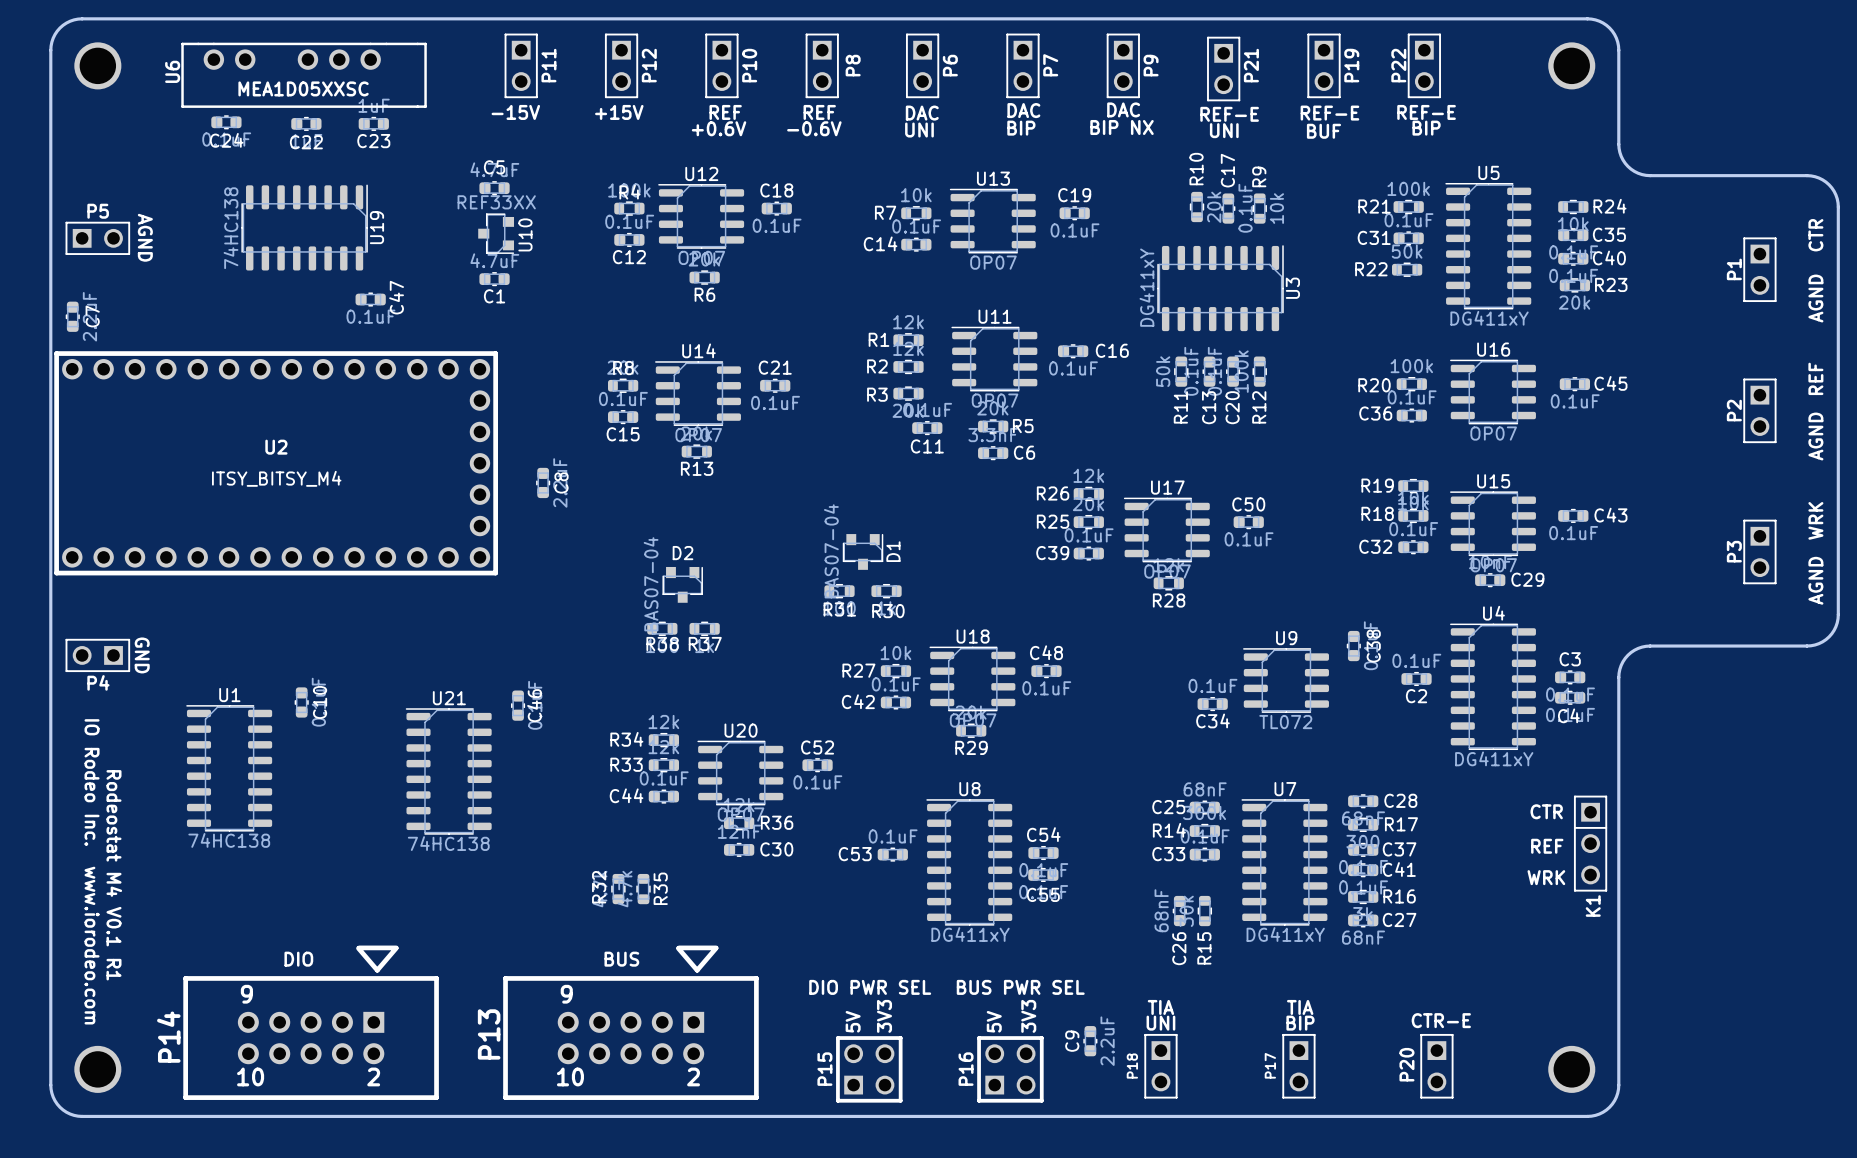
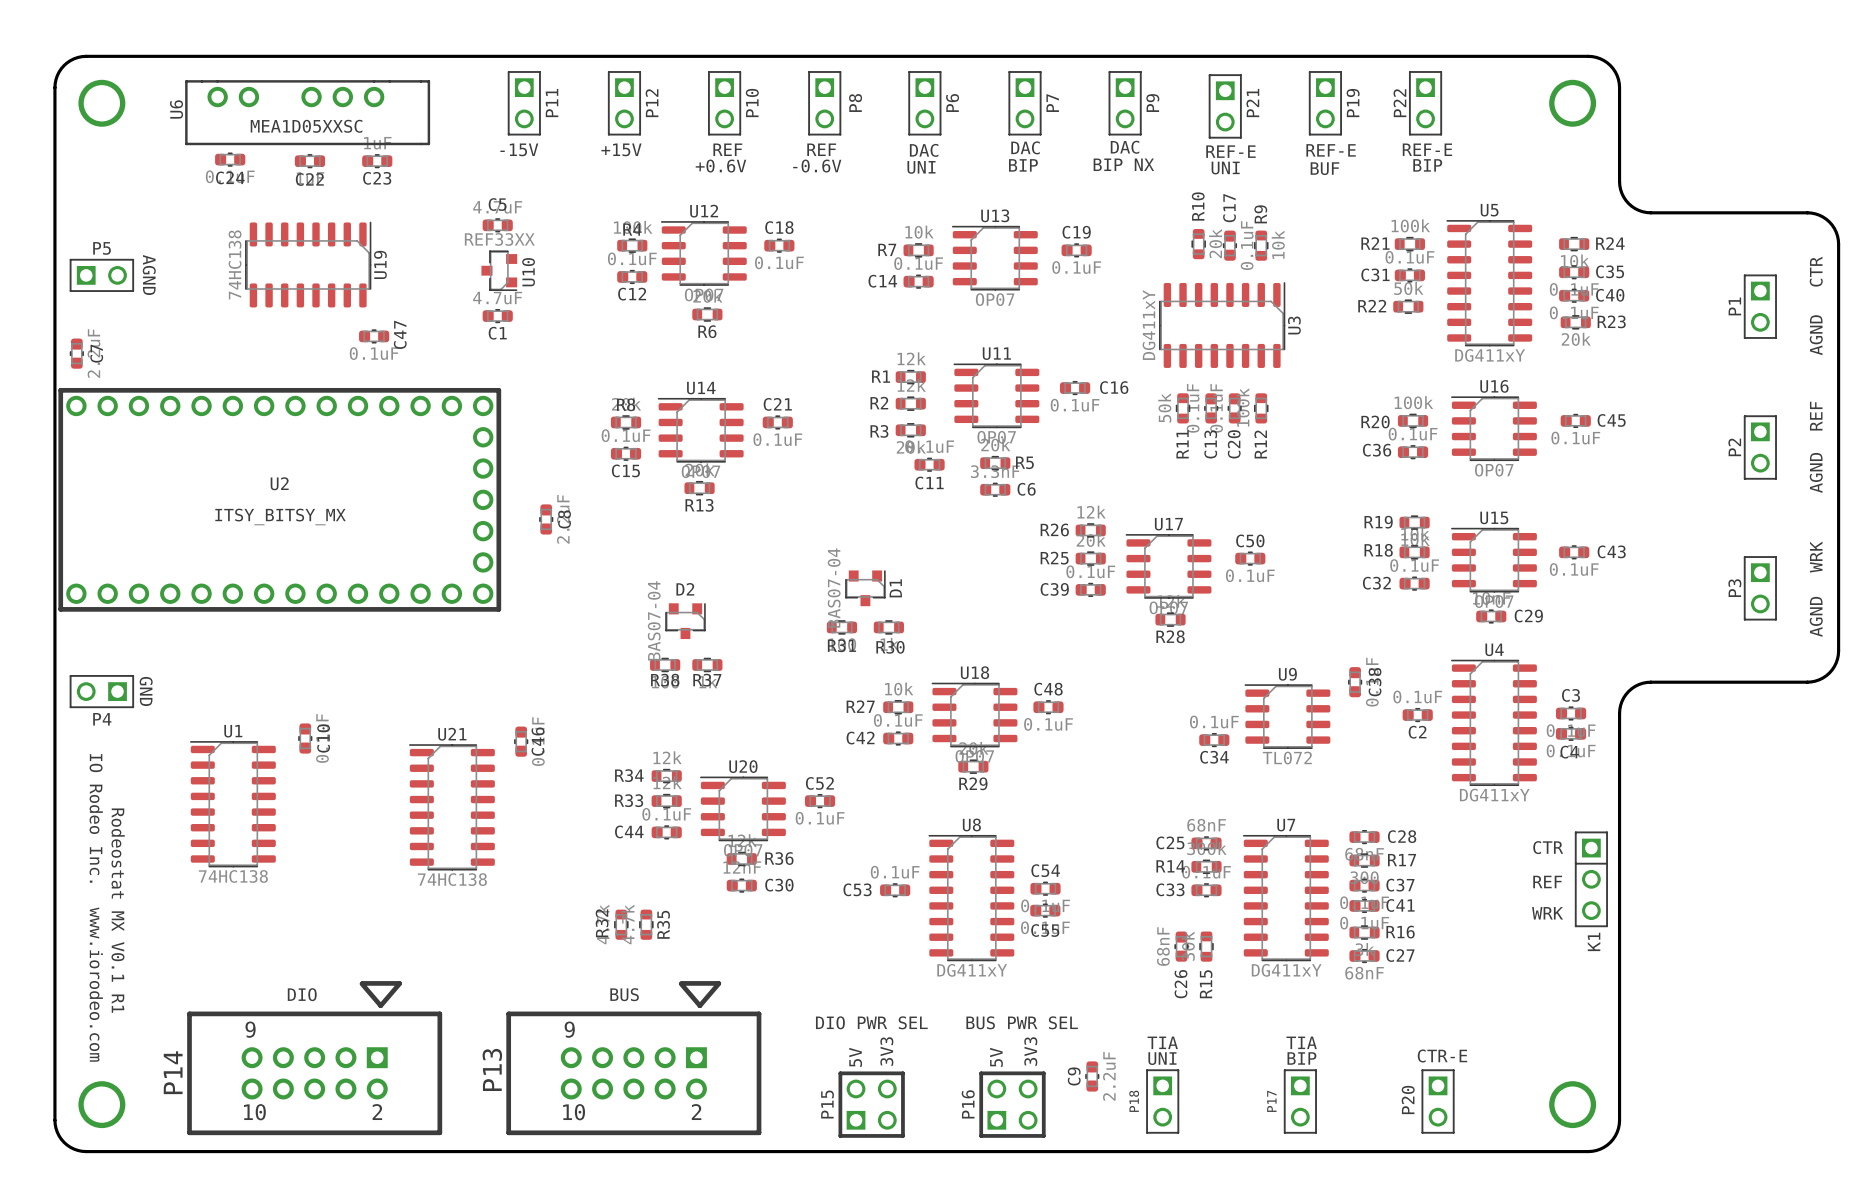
U2 value: ITSY_BITSY_M4 (276, 478) -> ITSY_BITSY_MX (280, 516)
text: Rodeostat M4 V0.1 R1 (114, 875) -> Rodeostat MX V0.1 R1 (118, 910)

